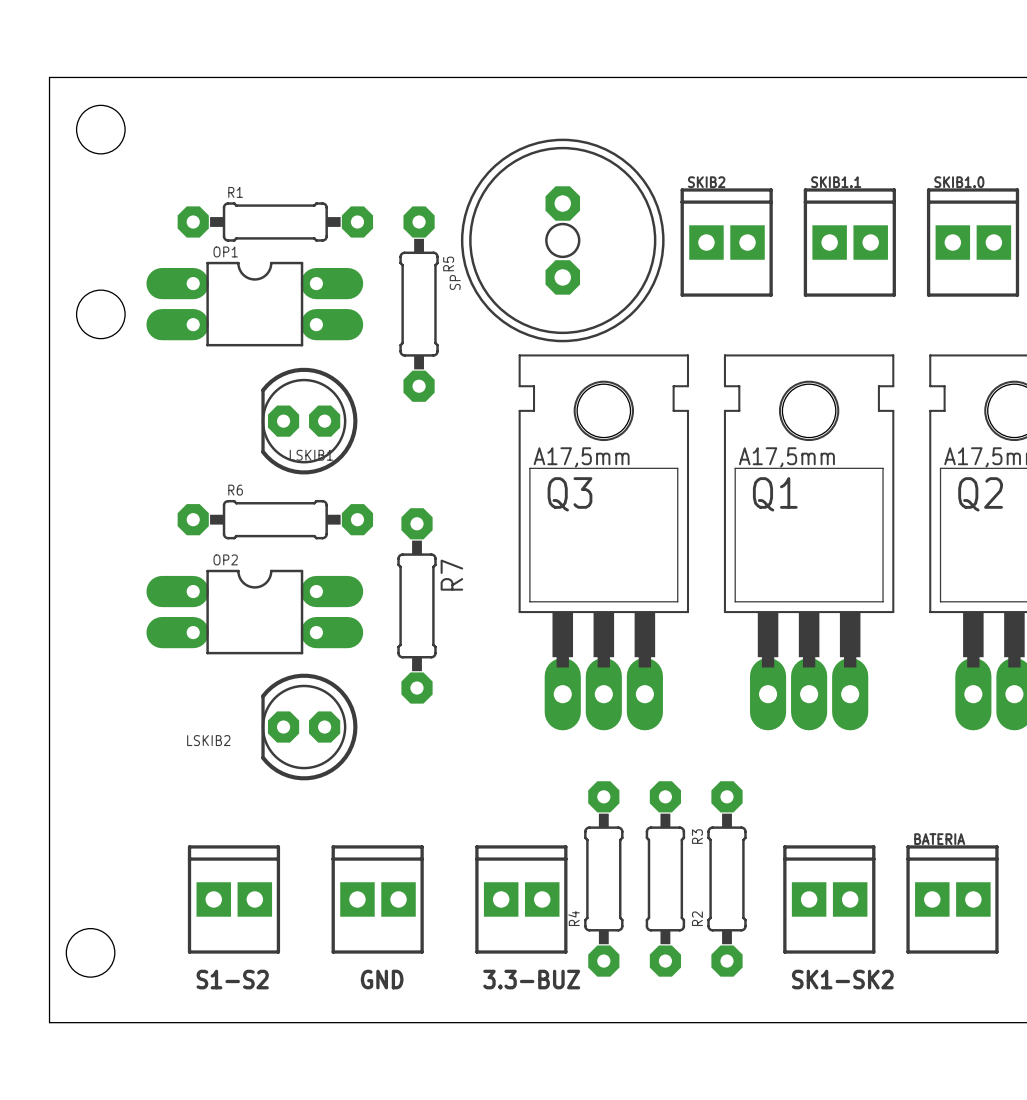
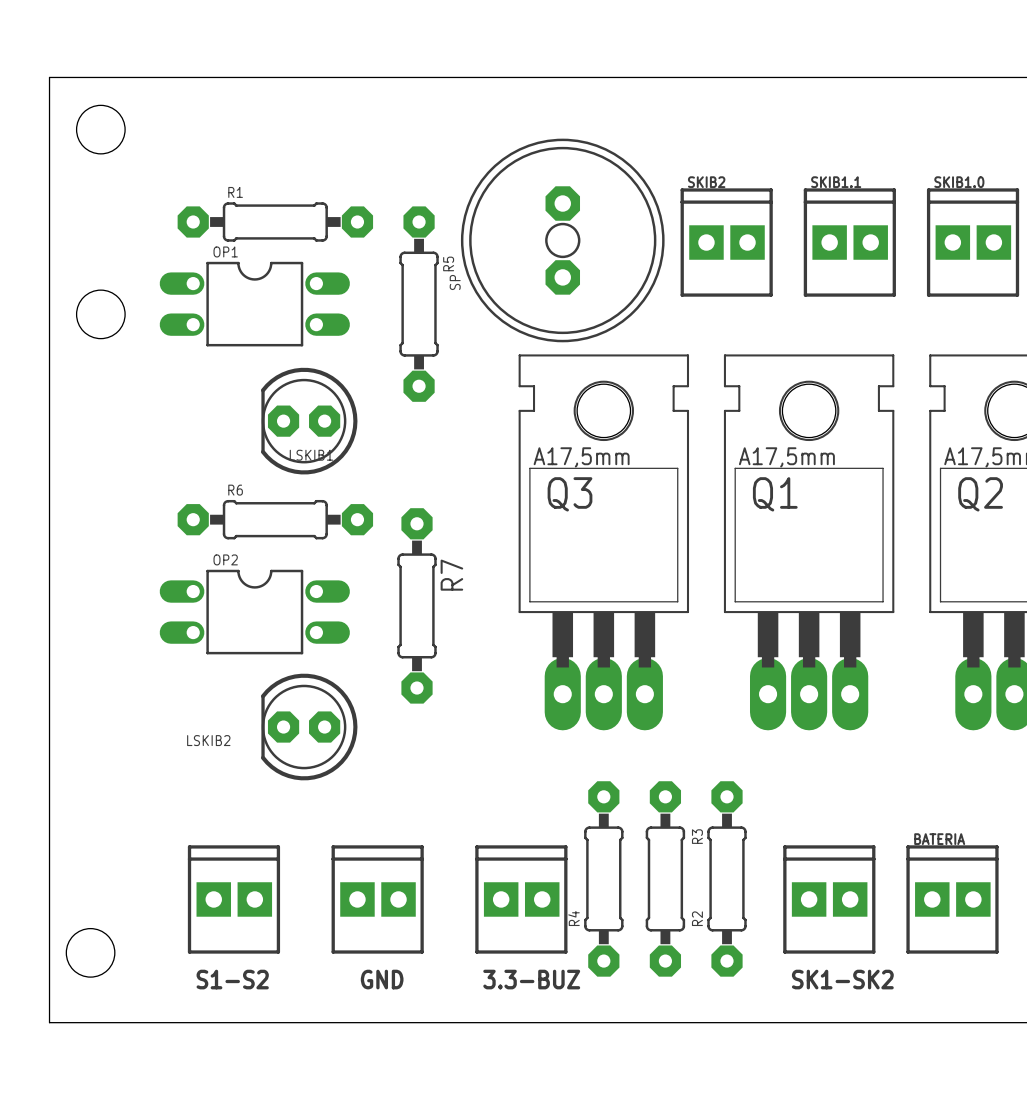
OP1 footprint: [146, 261, 364, 347] -> [159, 261, 350, 347]
OP2 footprint: [146, 569, 364, 655] -> [159, 569, 350, 655]

